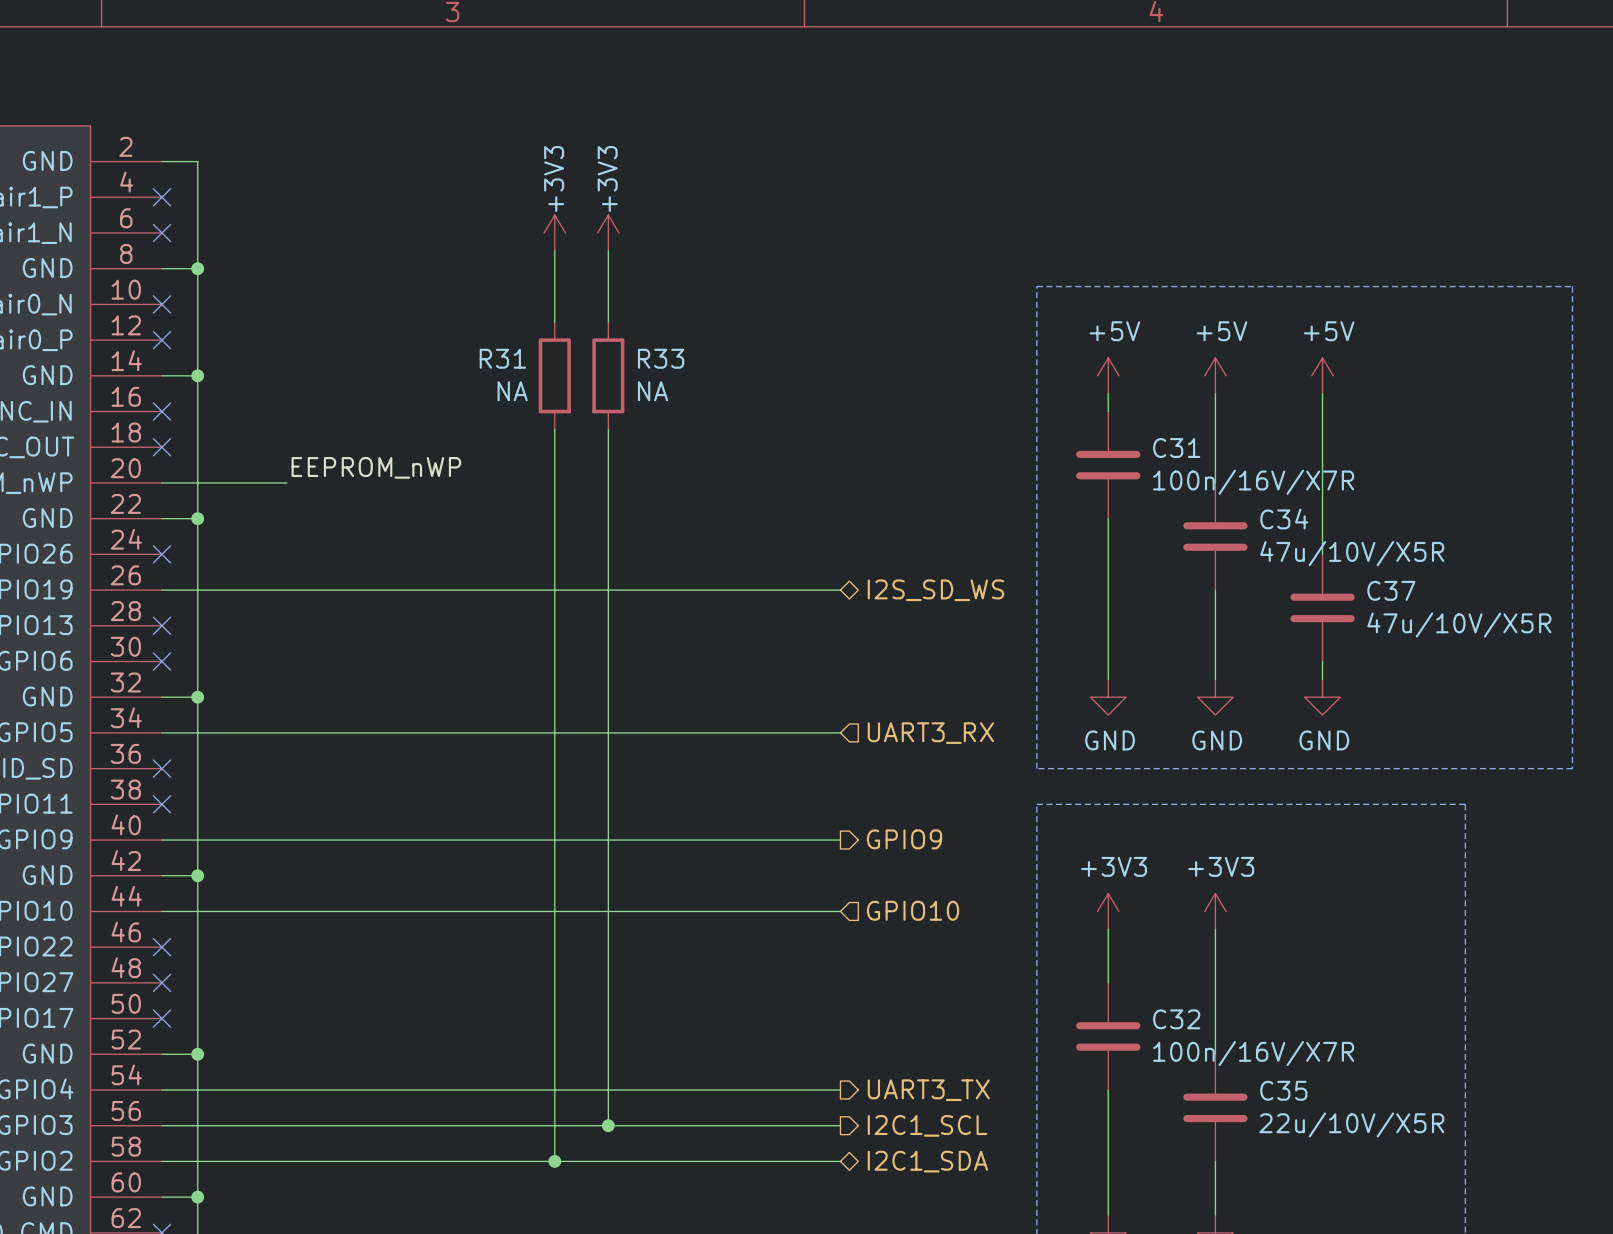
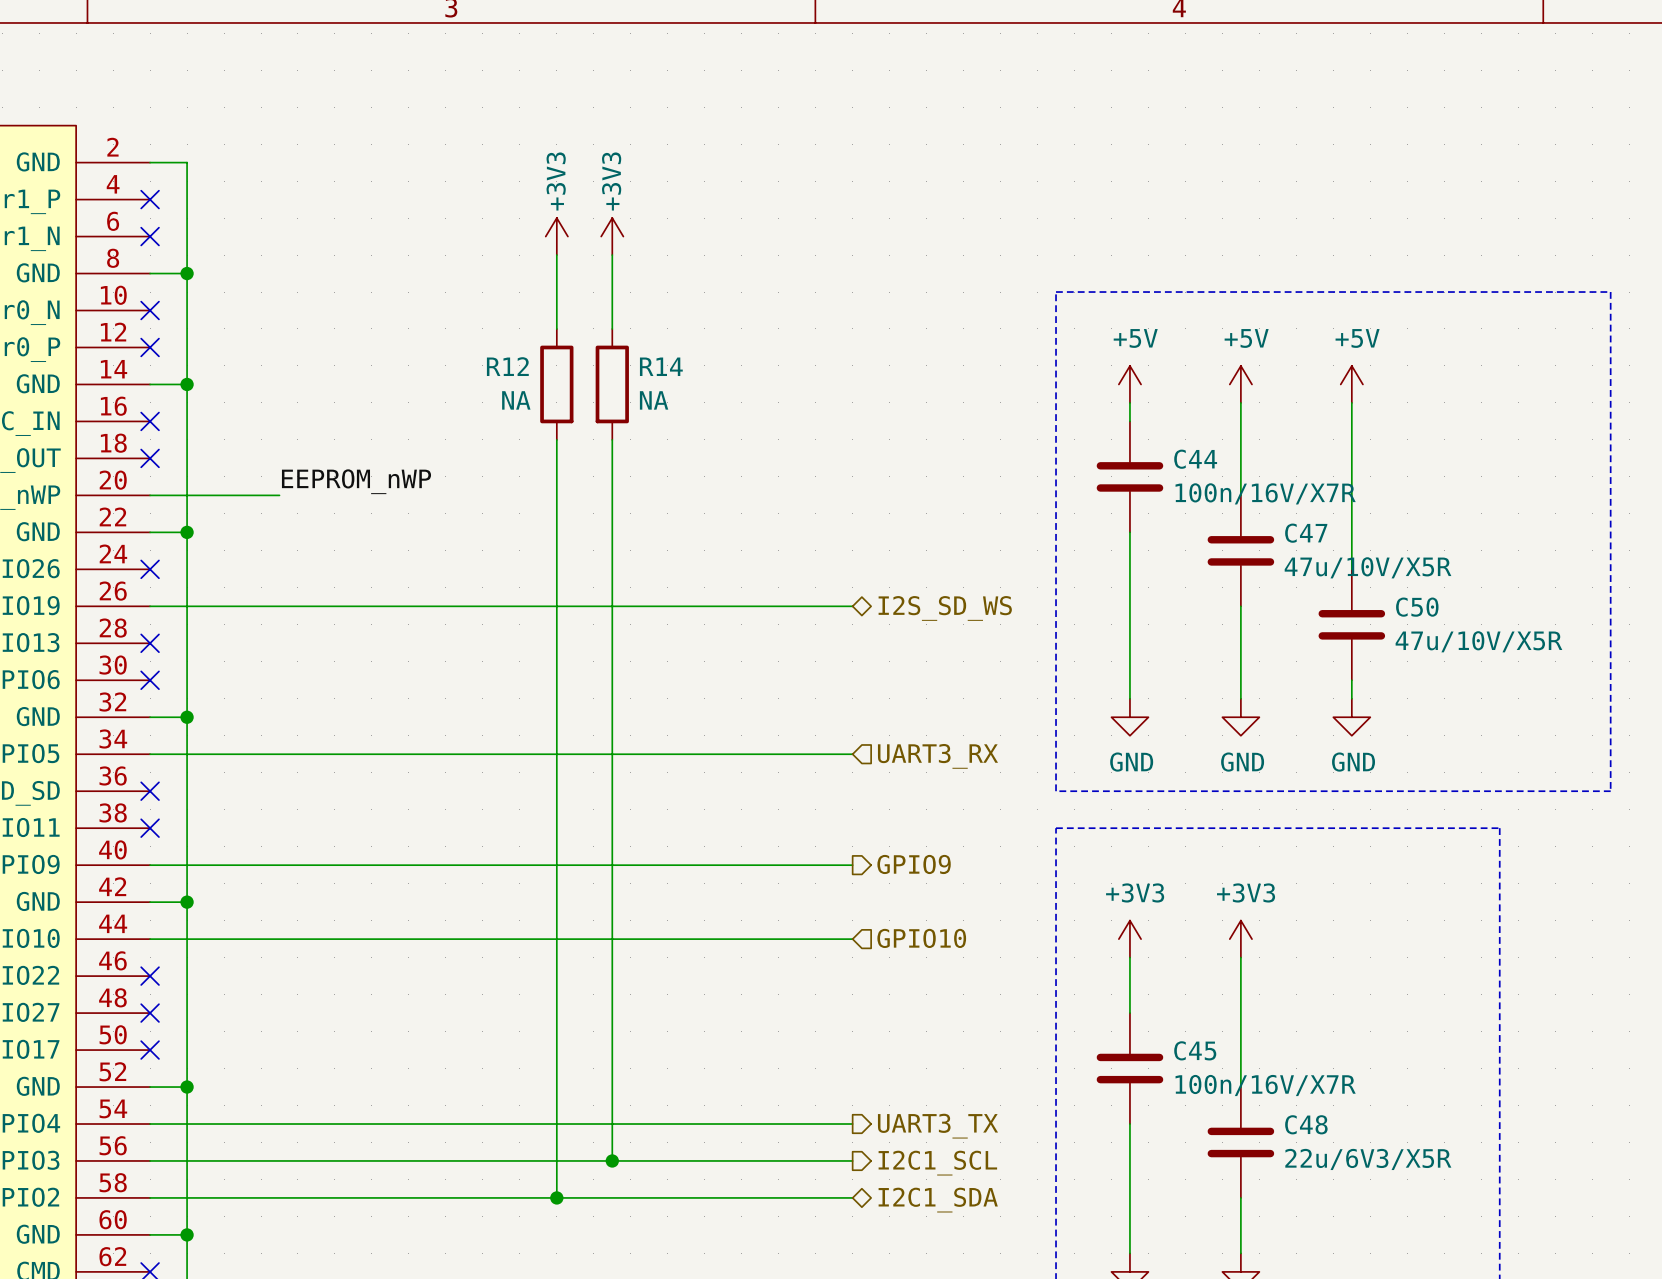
R31 name: R31 (502, 358) -> R12 (507, 366)
R33 name: R33 (661, 358) -> R14 (661, 366)
C31 name: C31 (1176, 448) -> C44 (1195, 459)
C34 name: C34 (1284, 519) -> C47 (1306, 533)
C37 name: C37 (1391, 590) -> C50 (1417, 607)
C32 name: C32 (1176, 1019) -> C45 (1195, 1050)
C35 name: C35 (1283, 1090) -> C48 (1306, 1124)
C35 value: 22u/10V/X5R (1351, 1124) -> 22u/6V3/X5R (1368, 1159)

